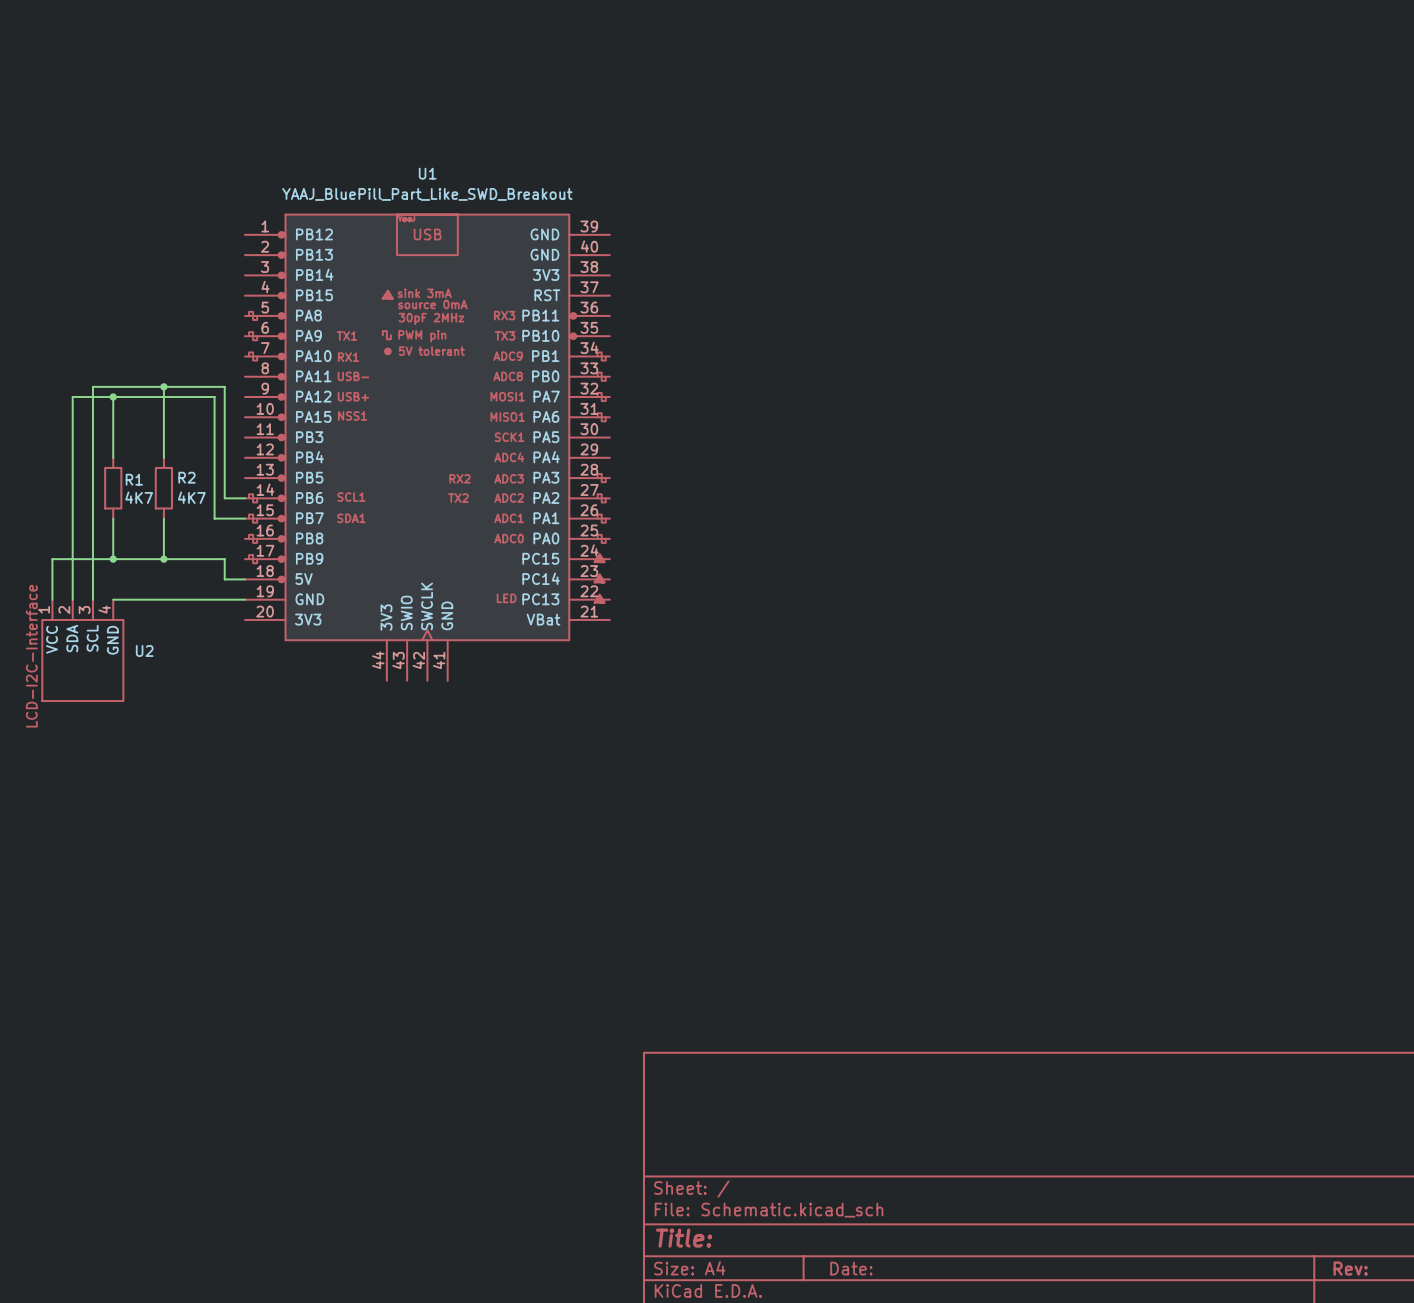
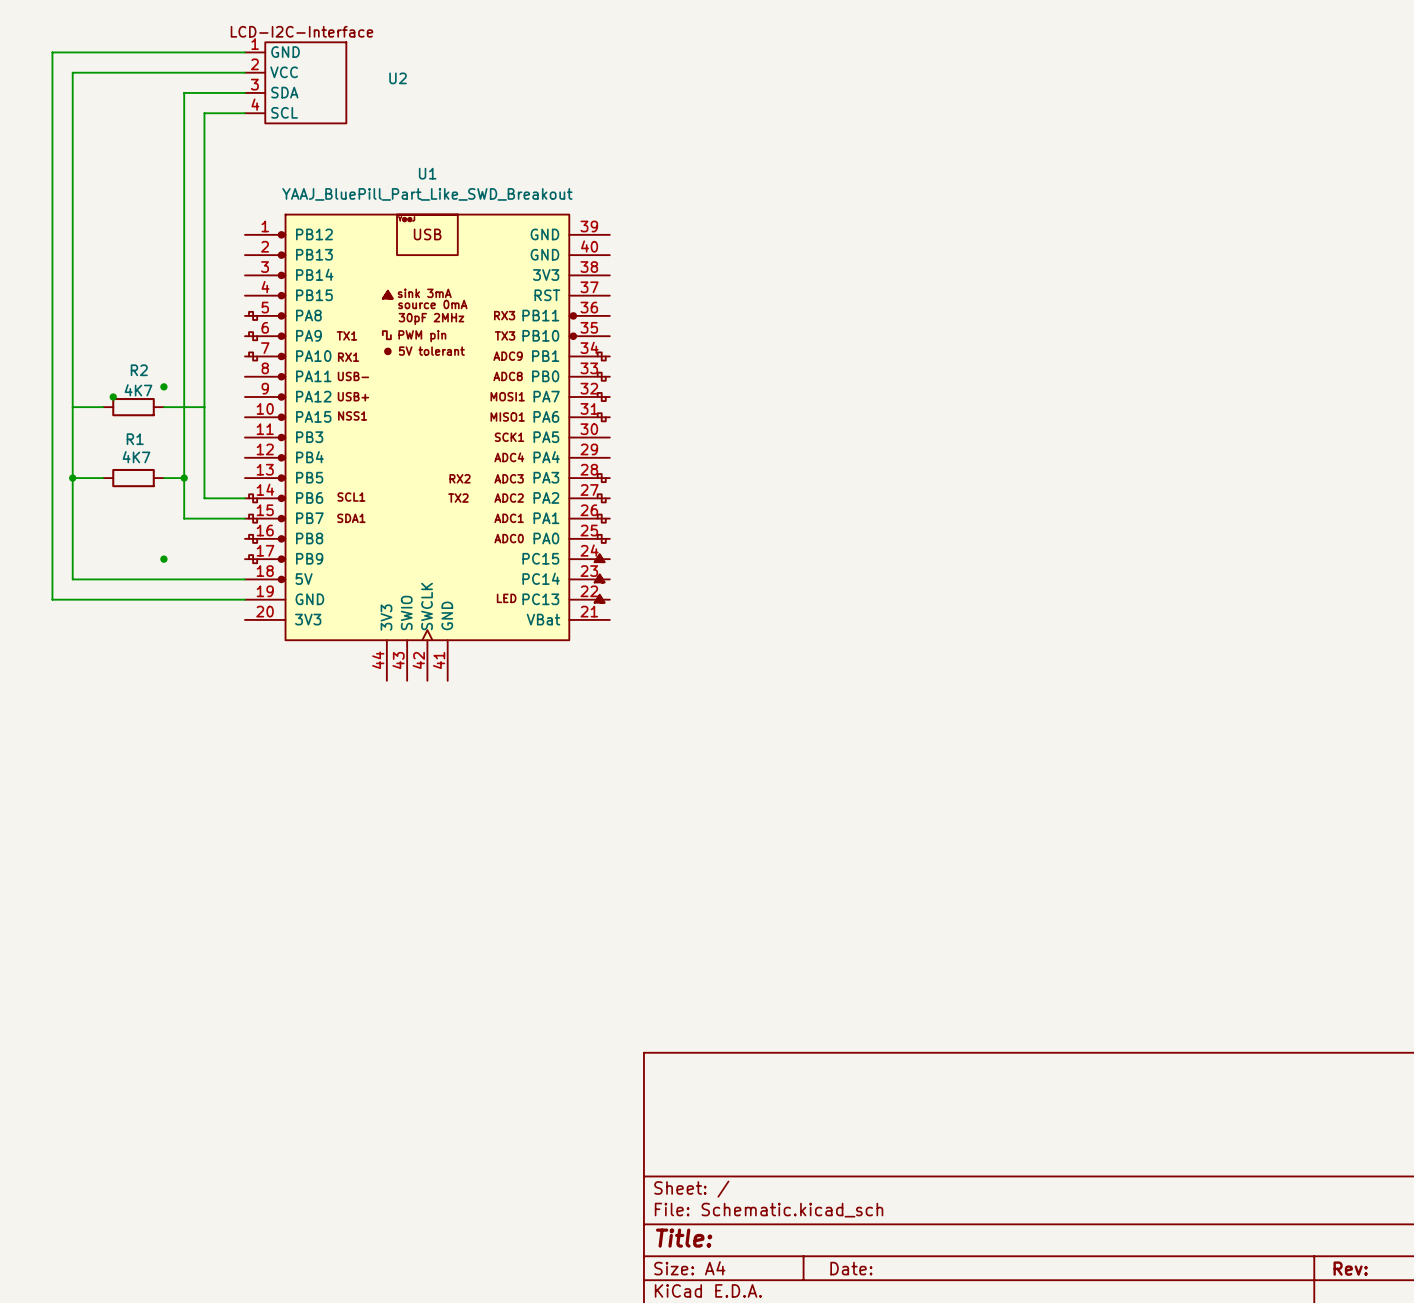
wire: none -> (244, 52) (52, 52) (52, 559)
wire: none -> (244, 72) (72, 72) (72, 397)
wire: (163, 386) (163, 457) -> none
wire: (72, 397) (214, 397) (214, 518) -> (244, 92) (184, 92) (184, 518) (214, 518)
wire: (113, 397) (113, 457) -> none
wire: none -> (72, 407) (103, 407)
wire: none -> (163, 407) (204, 407)
R2 name position: R2 (187, 477) -> R2 (139, 370)
wire: none -> (72, 478) (103, 478)
junction: none -> (72, 478)
wire: none -> (163, 478) (184, 478)
junction: none -> (184, 478)
R1 name position: R1 (134, 479) -> R1 (135, 439)
R1 rotation: 0° (113, 488) -> 90° clockwise (133, 478)
R2 rotation: 0° (163, 488) -> 90° clockwise (133, 407)
R2 position: (163, 488) -> (133, 407)
R1 value position: 4K7 (139, 497) -> 4K7 (136, 457)
R2 value position: 4K7 (191, 497) -> 4K7 (138, 390)
wire: (224, 498) (224, 386) (92, 386) (92, 599) -> (224, 498) (204, 498) (204, 113) (244, 113)
wire: (113, 518) (113, 559) -> none
wire: (163, 518) (163, 559) -> none
wire: (52, 559) (224, 559) (224, 579) -> (72, 579) (224, 579)
junction: (113, 559) -> none
wire: (72, 579) (72, 599) -> none
U2 symbol: [42, 599, 124, 702] -> [244, 42, 347, 124]
wire: none -> (52, 599) (113, 599)
U2 name position: U2 (144, 650) -> U2 (398, 78)

